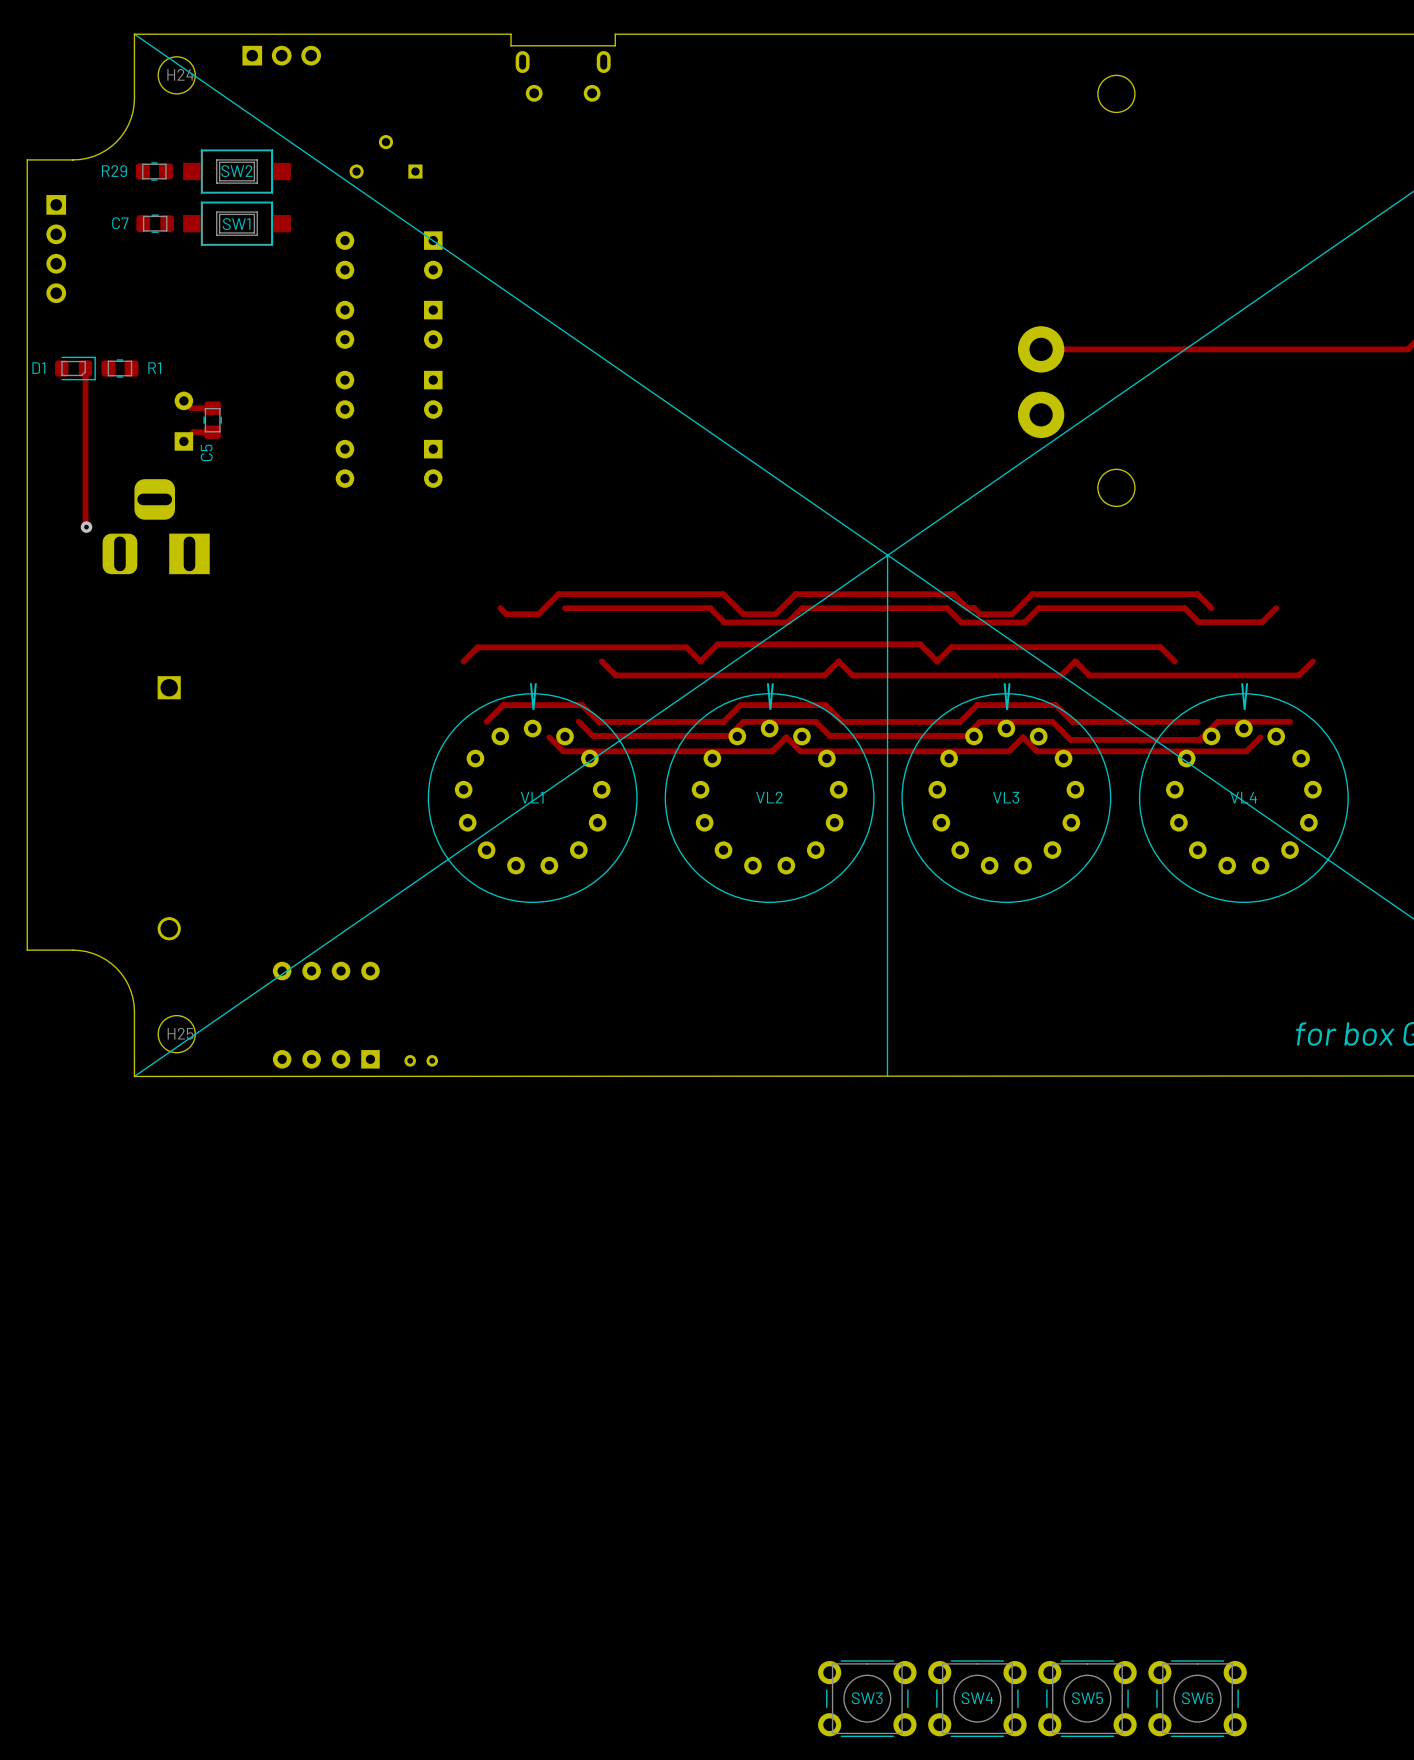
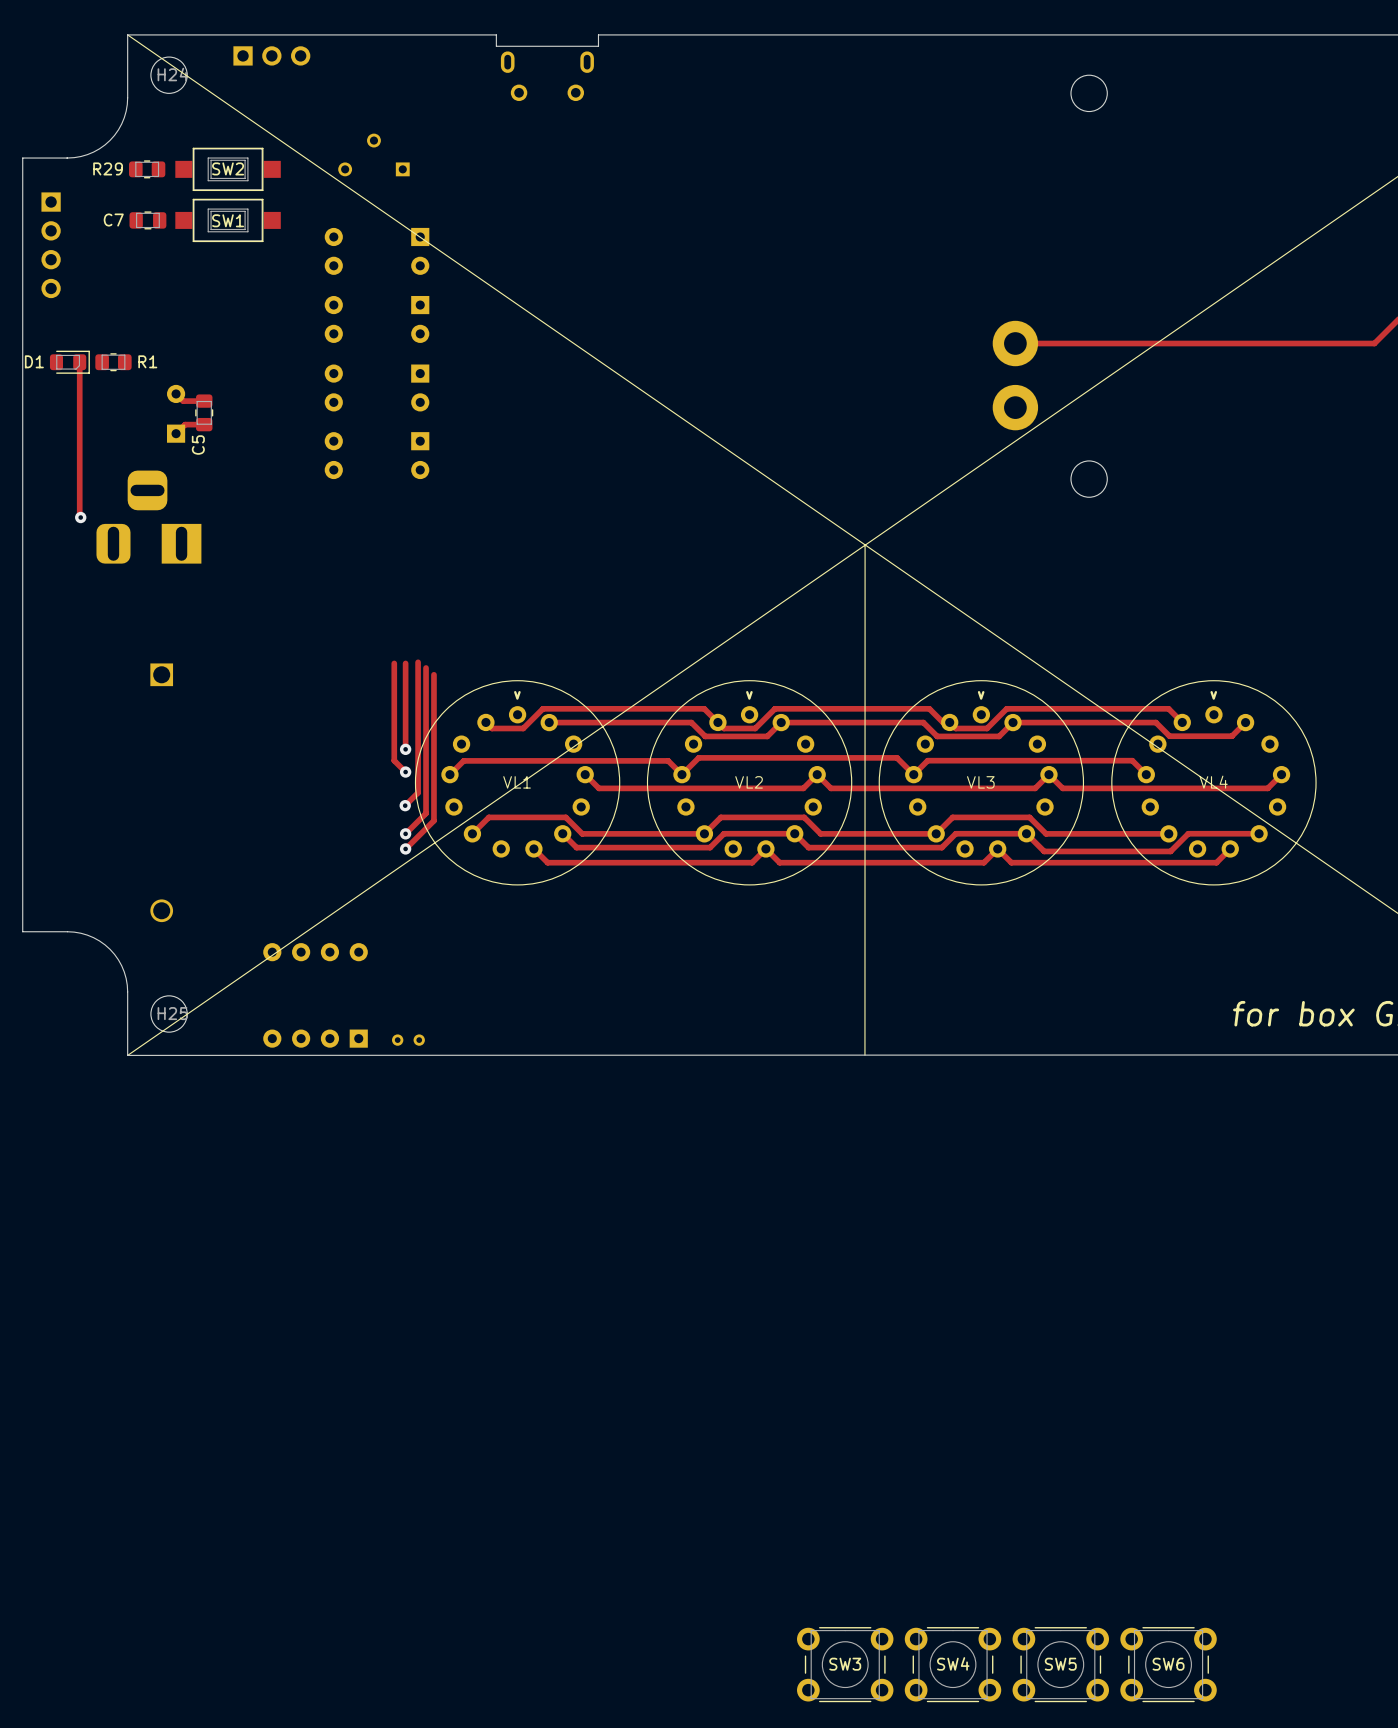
track: (500, 608) (506, 614) (538, 614) (558, 594) (723, 594) (743, 614) (775, 614) (795, 594) (953, 594) (967, 608) (974, 608) (980, 614) (1012, 614) (1032, 594) (1197, 594) (1211, 608) -> (485, 722) (491, 728) (523, 728) (542, 708) (704, 708) (723, 728) (755, 728) (774, 708) (929, 708) (943, 722) (949, 722) (955, 728) (987, 728) (1006, 708) (1168, 708) (1182, 722)
track: (565, 608) (710, 608) (724, 622) (787, 622) (801, 608) (947, 608) (961, 622) (1024, 622) (1038, 608) (1184, 608) (1198, 622) (1262, 622) (1276, 608) -> (549, 722) (691, 722) (705, 736) (767, 736) (781, 722) (923, 722) (937, 736) (999, 736) (1013, 722) (1155, 722) (1169, 736) (1231, 736) (1245, 722)
track: (463, 661) (477, 647) (686, 647) (700, 661) (717, 644) (920, 644) (937, 661) (951, 647) (1160, 647) (1174, 661) -> (449, 774) (463, 760) (668, 760) (681, 774) (698, 757) (896, 757) (913, 774) (927, 760) (1132, 760) (1146, 774)
track: (601, 661) (615, 675) (824, 675) (838, 661) (852, 675) (1061, 675) (1075, 661) (1089, 675) (1298, 675) (1312, 661) -> (585, 774) (598, 788) (803, 788) (817, 774) (830, 788) (1035, 788) (1048, 774) (1062, 788) (1267, 788) (1281, 774)
track: none -> (418, 662) (418, 792) (405, 805)
track: none -> (394, 663) (394, 760) (405, 772)
track: none -> (405, 663) (405, 749)
track: none -> (426, 667) (426, 813) (405, 833)
track: none -> (433, 674) (433, 820) (405, 848)
track: (486, 721) (503, 705) (581, 705) (598, 721) (723, 721) (740, 705) (825, 705) (842, 721) (960, 721) (977, 705) (1055, 705) (1072, 721) (1197, 721) -> (472, 833) (488, 817) (565, 817) (582, 833) (704, 833) (720, 817) (804, 817) (820, 833) (936, 833) (952, 817) (1029, 817) (1046, 833) (1168, 833)
track: (578, 721) (592, 735) (729, 735) (743, 721) (815, 721) (829, 735) (966, 735) (980, 721) (1052, 721) (1070, 739) (1199, 739) (1217, 721) (1290, 721) -> (562, 833) (576, 847) (710, 847) (723, 833) (794, 833) (808, 847) (941, 847) (955, 833) (1026, 833) (1044, 851) (1170, 851) (1188, 833) (1259, 833)
track: (549, 737) (563, 751) (772, 751) (786, 737) (800, 751) (1008, 751) (1023, 737) (1037, 751) (1246, 751) (1260, 737) -> (533, 848) (547, 862) (752, 862) (765, 848) (779, 862) (983, 862) (997, 848) (1011, 862) (1216, 862) (1230, 848)
via: none -> (405, 749)
via: none -> (405, 772)
via: none -> (405, 805)
via: none -> (405, 833)
via: none -> (405, 848)

